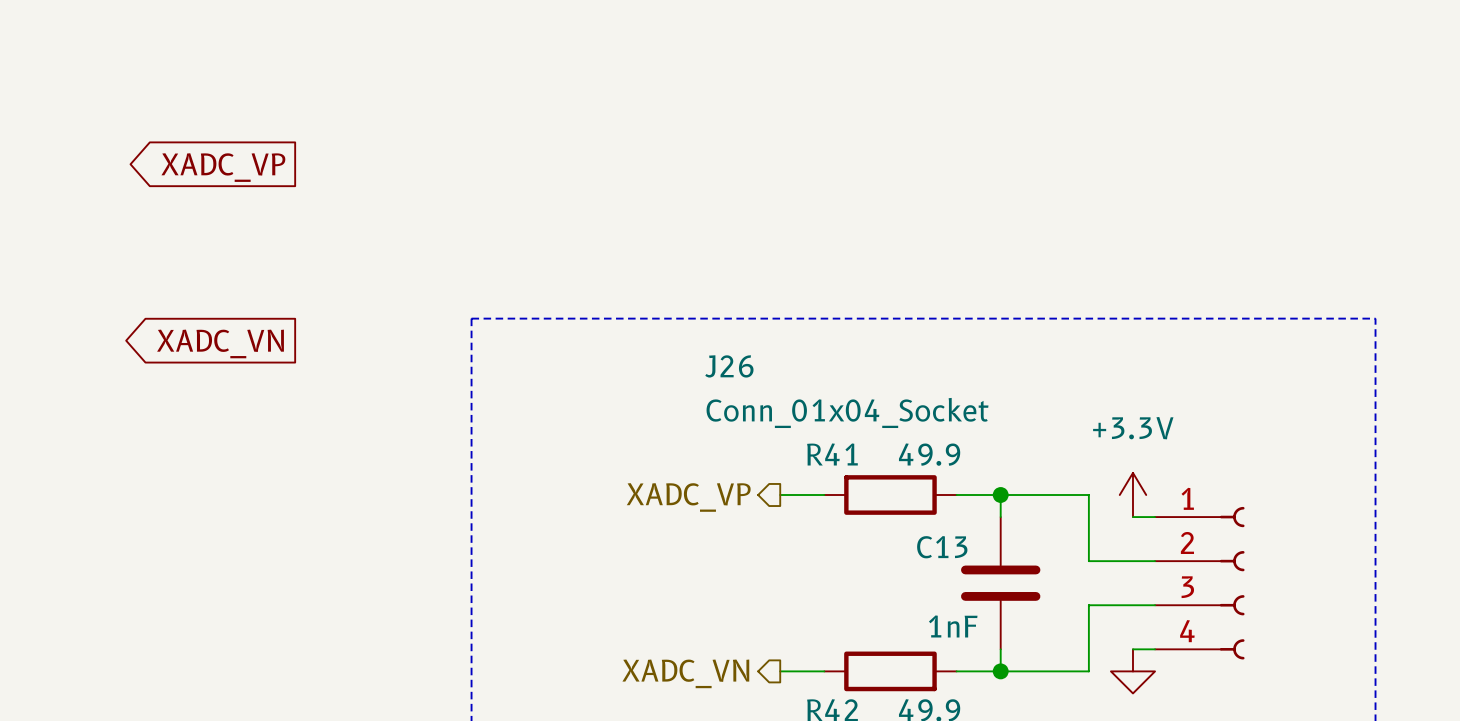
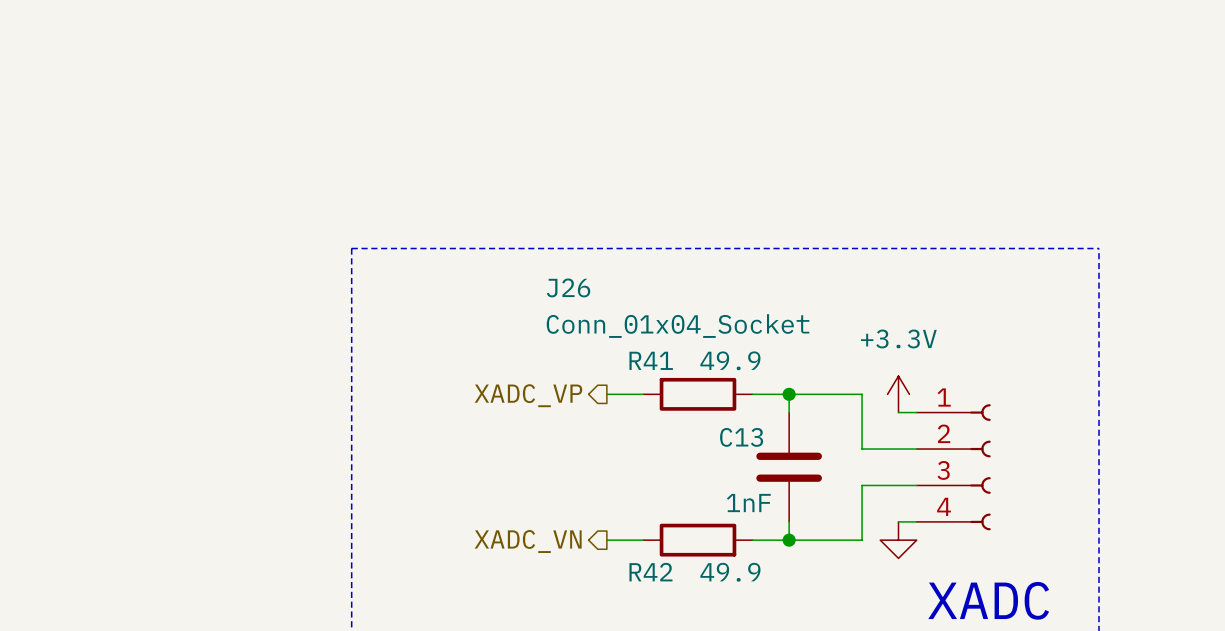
global label: XADC_VP (223, 167) -> none
global label: XADC_VN (220, 343) -> none

